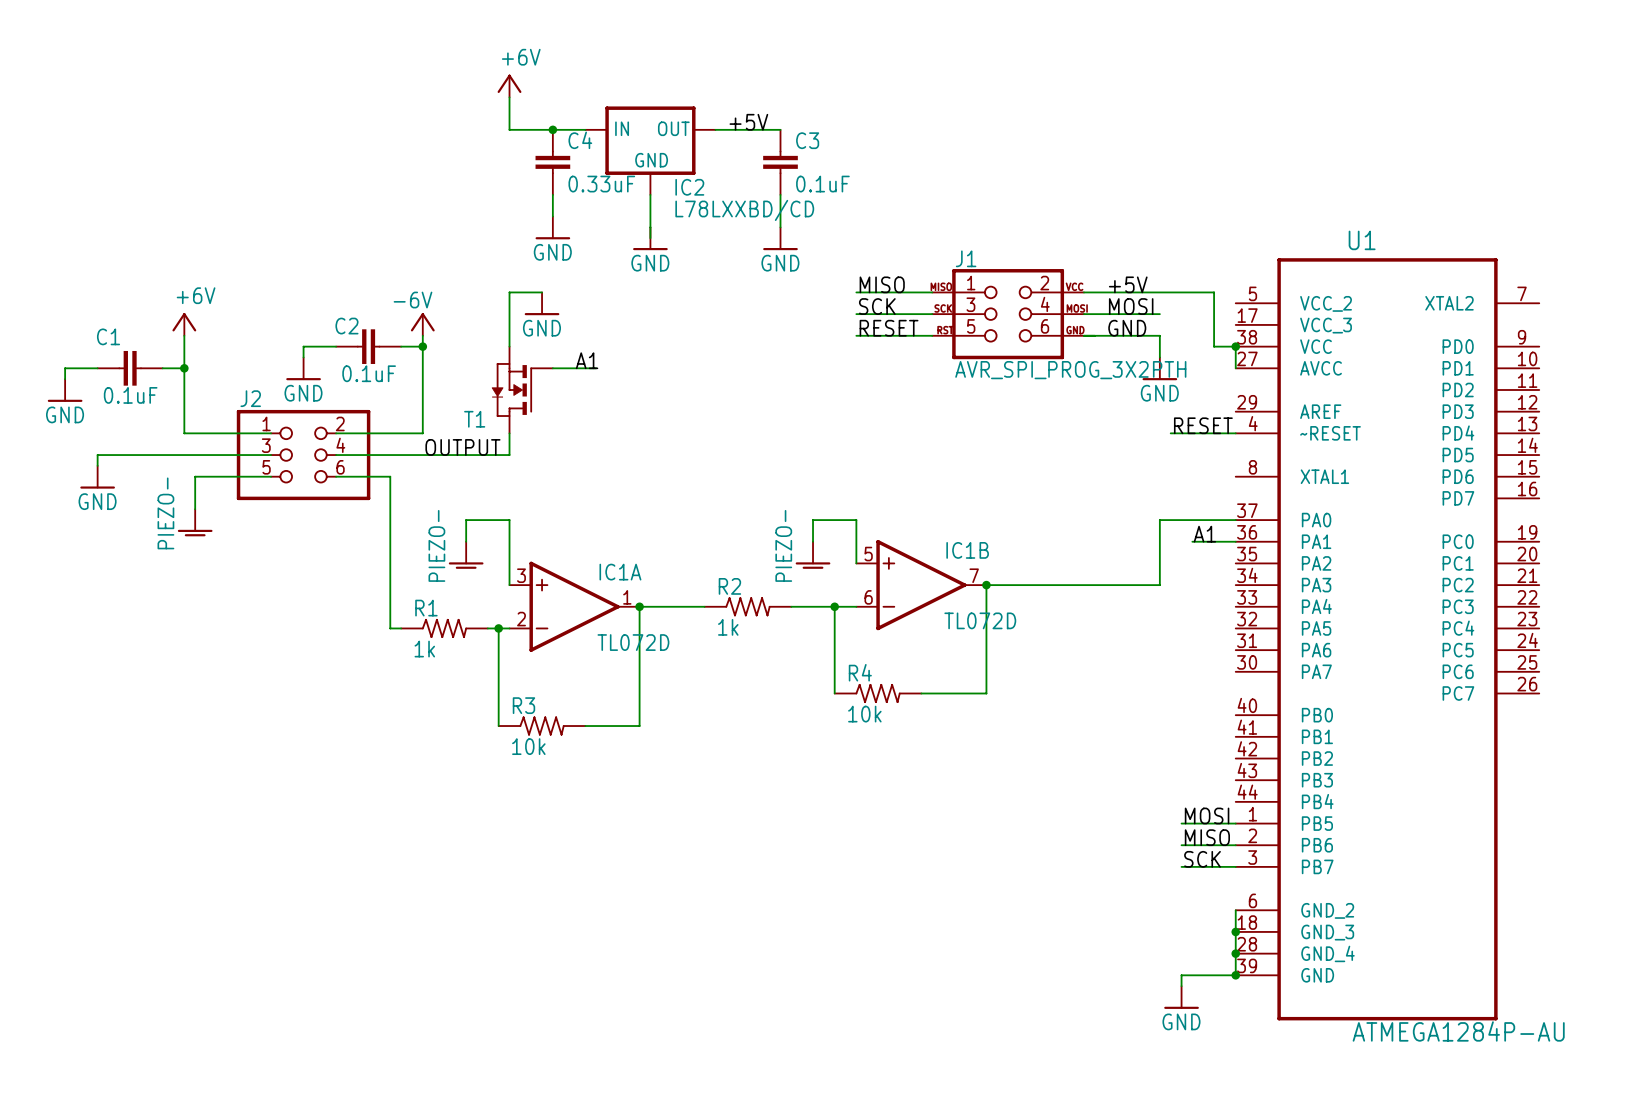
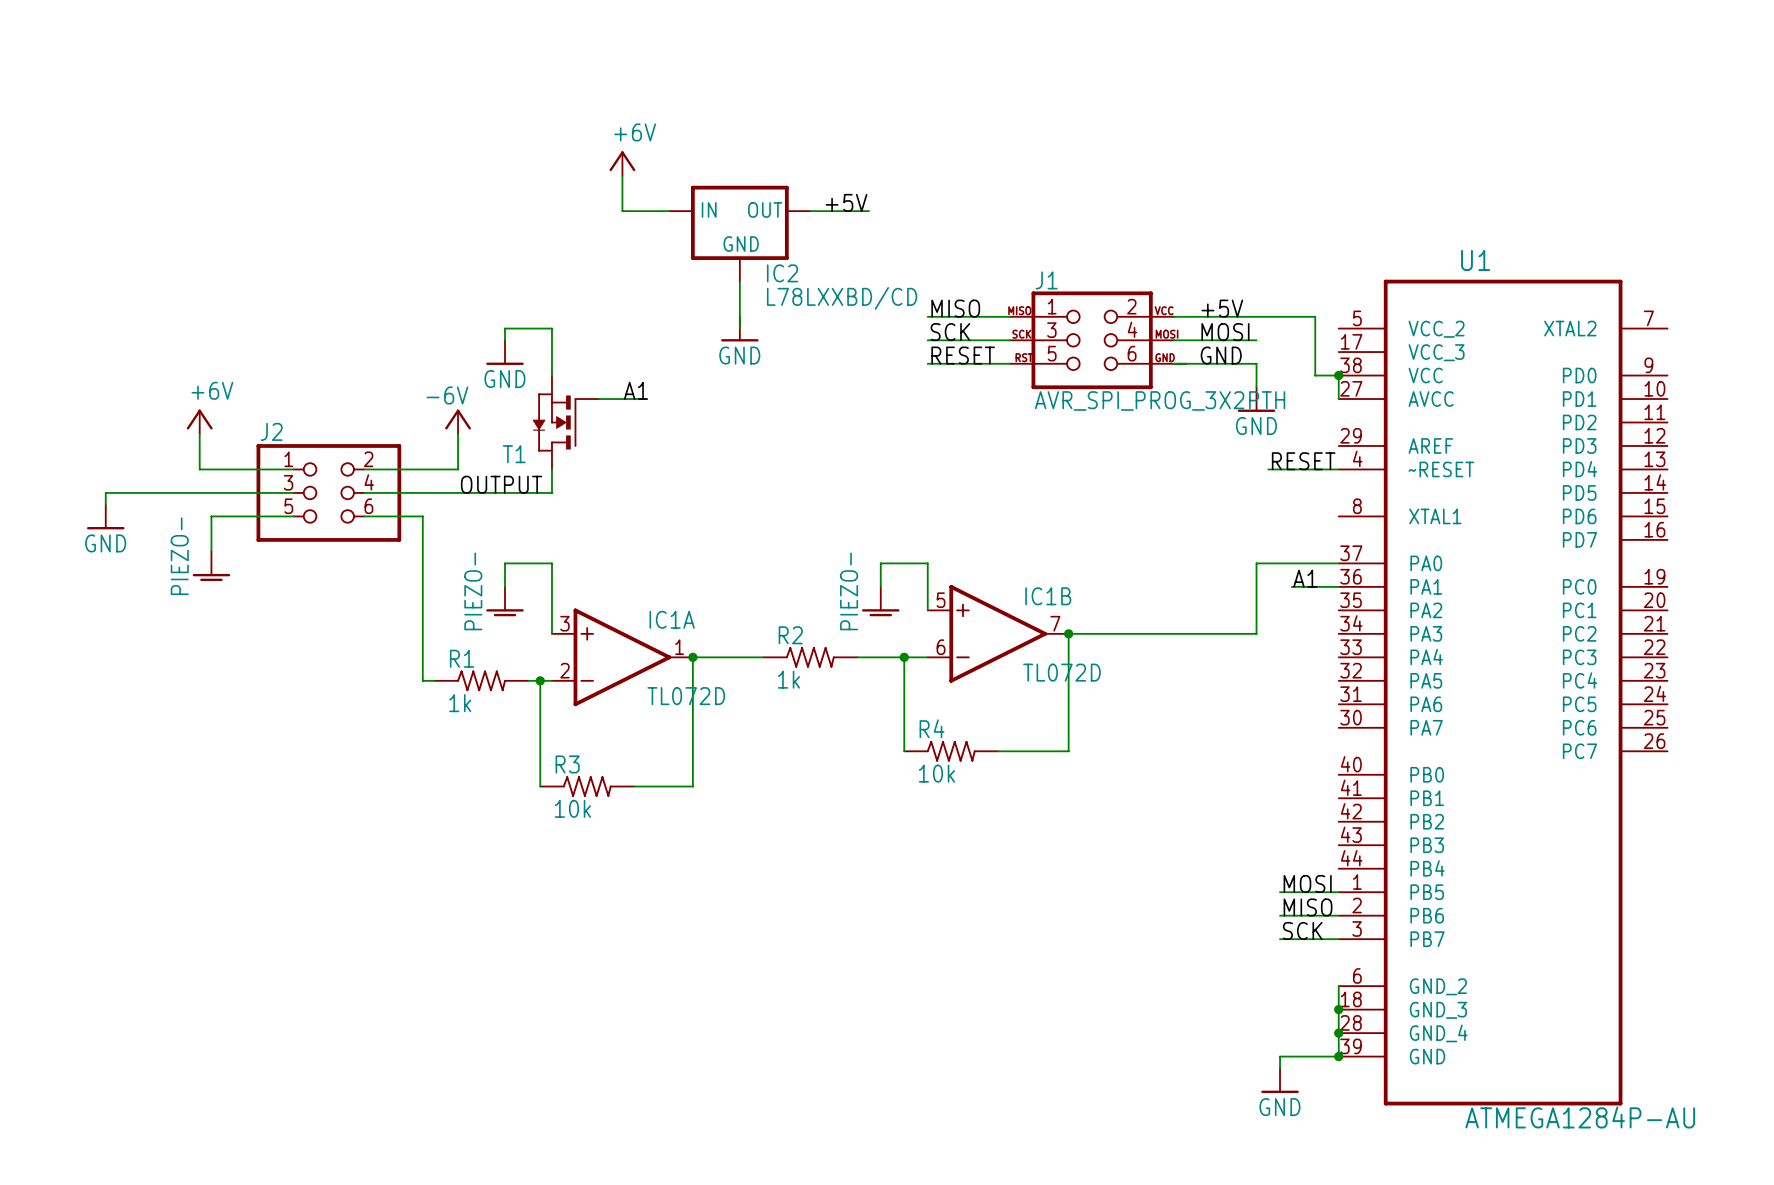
power symbol position: +6V (509, 85) -> +6V (622, 163)
wire: (509, 97) (509, 129) (585, 129) -> none
label position: +5V (748, 122) -> +5V (846, 202)
junction: (552, 129) -> none
wire: (715, 129) (780, 129) -> none
IC2 position: (650, 150) -> (739, 233)
C4: 0.33uF (552, 162) -> none
wire: none -> (622, 175) (622, 211) (669, 211)
C3: 0.1uF (780, 162) -> none
wire: (552, 194) (552, 216) -> none
wire: (650, 194) (650, 238) -> (739, 281) (739, 328)
wire: none -> (810, 211) (869, 211)
wire: (780, 194) (780, 227) -> none
power symbol: GND (552, 227) -> none
power symbol: GND (650, 238) -> none
power symbol: GND (780, 238) -> none
wire: (542, 292) (509, 292) (509, 303) -> (505, 340) (505, 328) (551, 328)
power symbol: GND (542, 303) -> none
power symbol: none -> GND (739, 329)
power symbol position: +6V (184, 324) -> +6V (199, 421)
power symbol position: -6V (422, 324) -> -6V (458, 421)
power symbol: none -> GND (505, 352)
wire: (184, 335) (184, 400) -> none
wire: (422, 335) (422, 400) -> none
wire: (336, 346) (303, 346) (303, 357) -> none
C2: 0.1uF (368, 346) -> none
wire: (401, 346) (422, 346) -> none
junction: (422, 346) -> none
wire: (97, 368) (65, 368) (65, 379) -> none
C1: 0.1uF (130, 368) -> none
wire: (162, 368) (184, 368) -> none
junction: (184, 368) -> none
power symbol: GND (303, 368) -> none
power symbol: GND (65, 390) -> none

